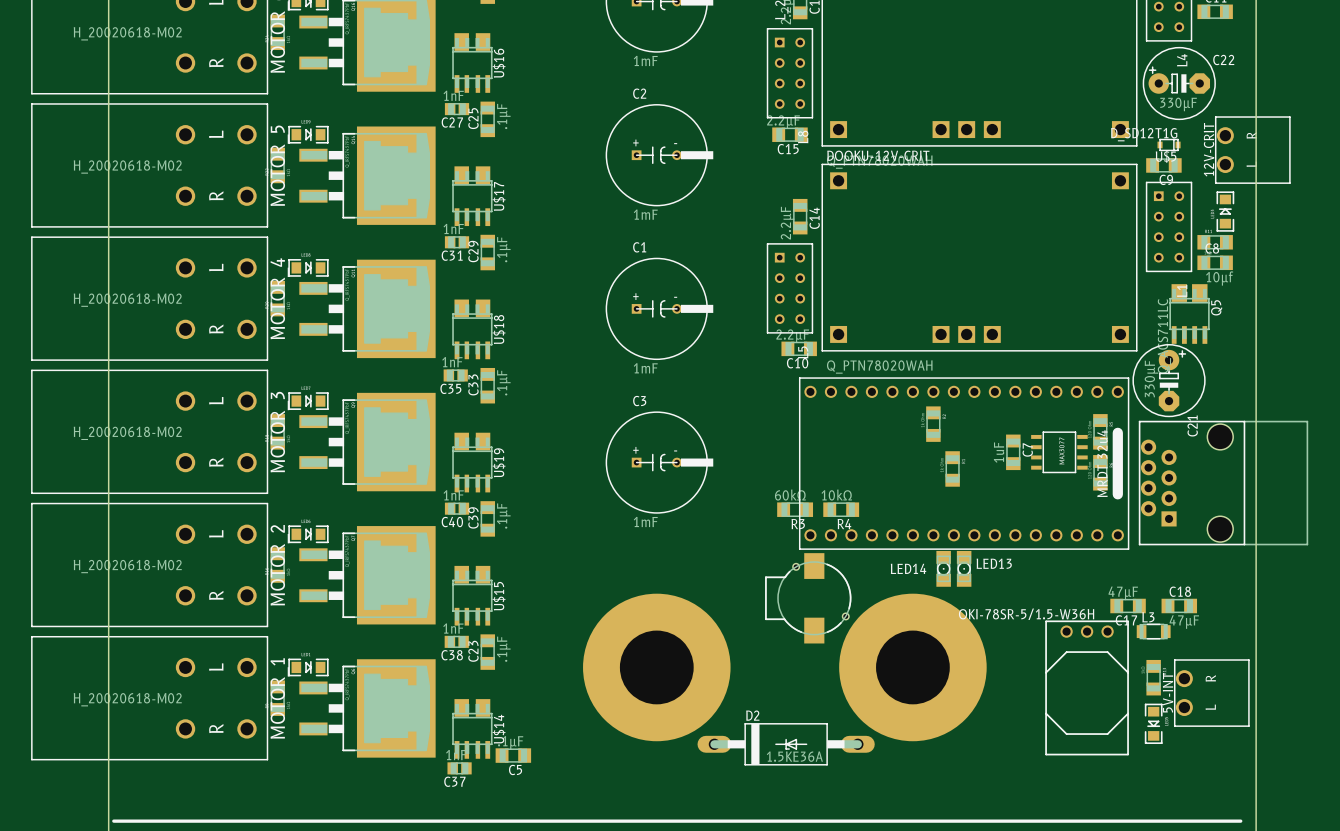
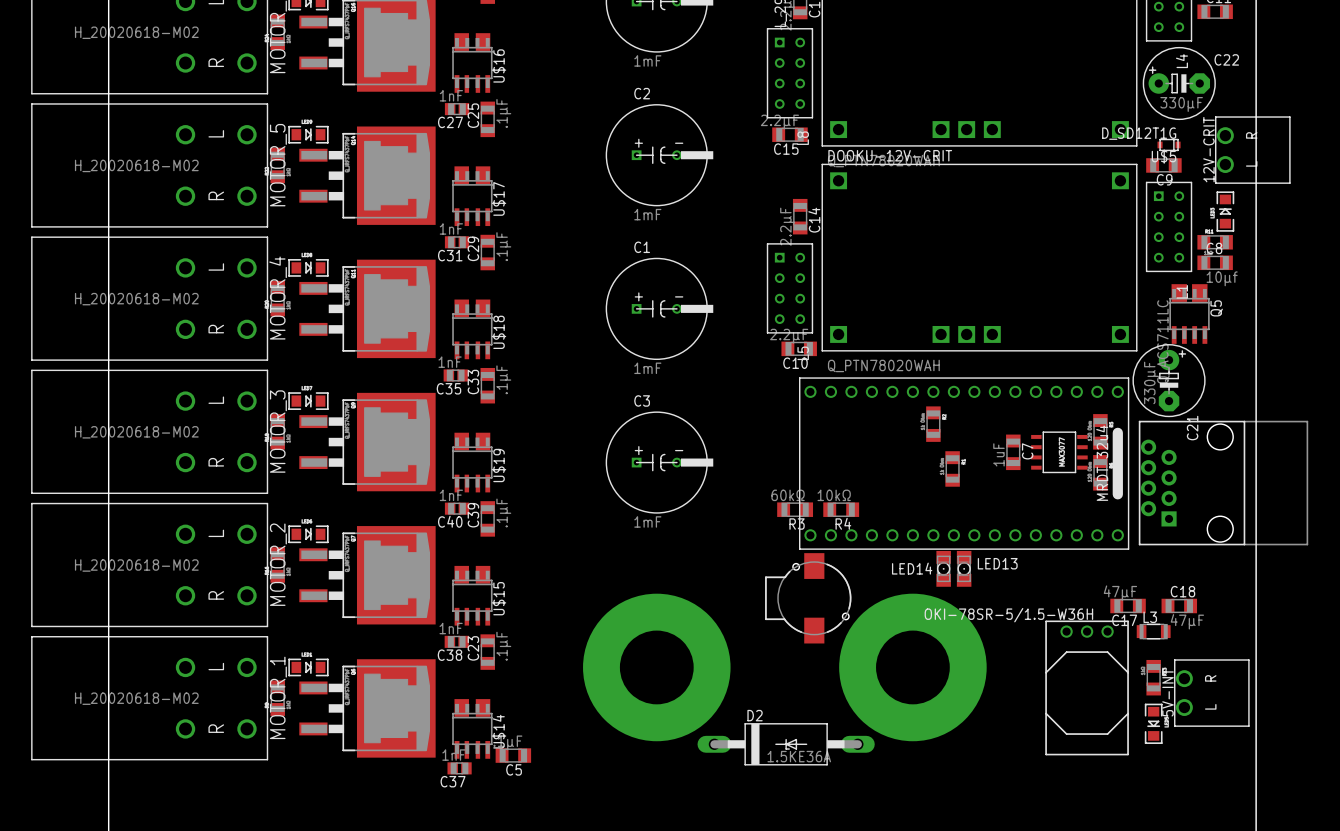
line: (113, 821) (1240, 821) -> none

